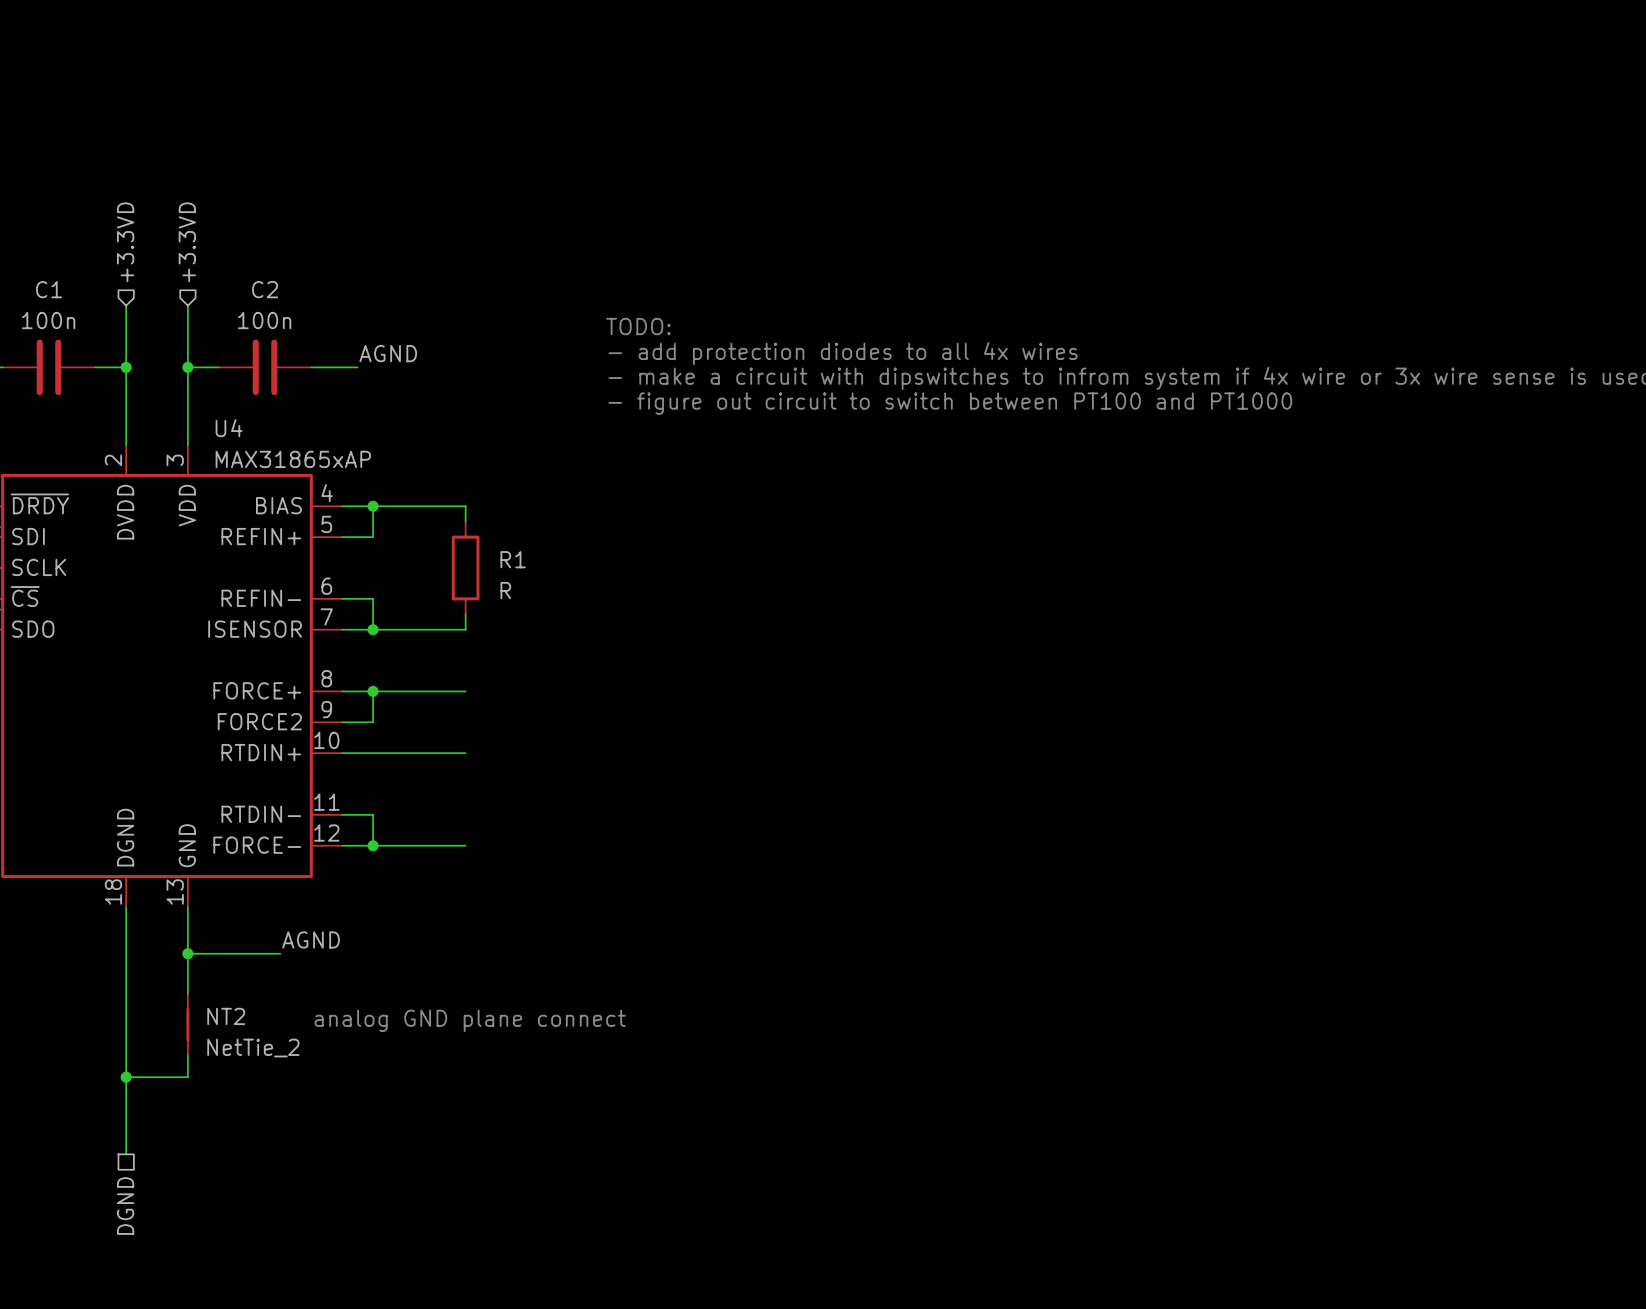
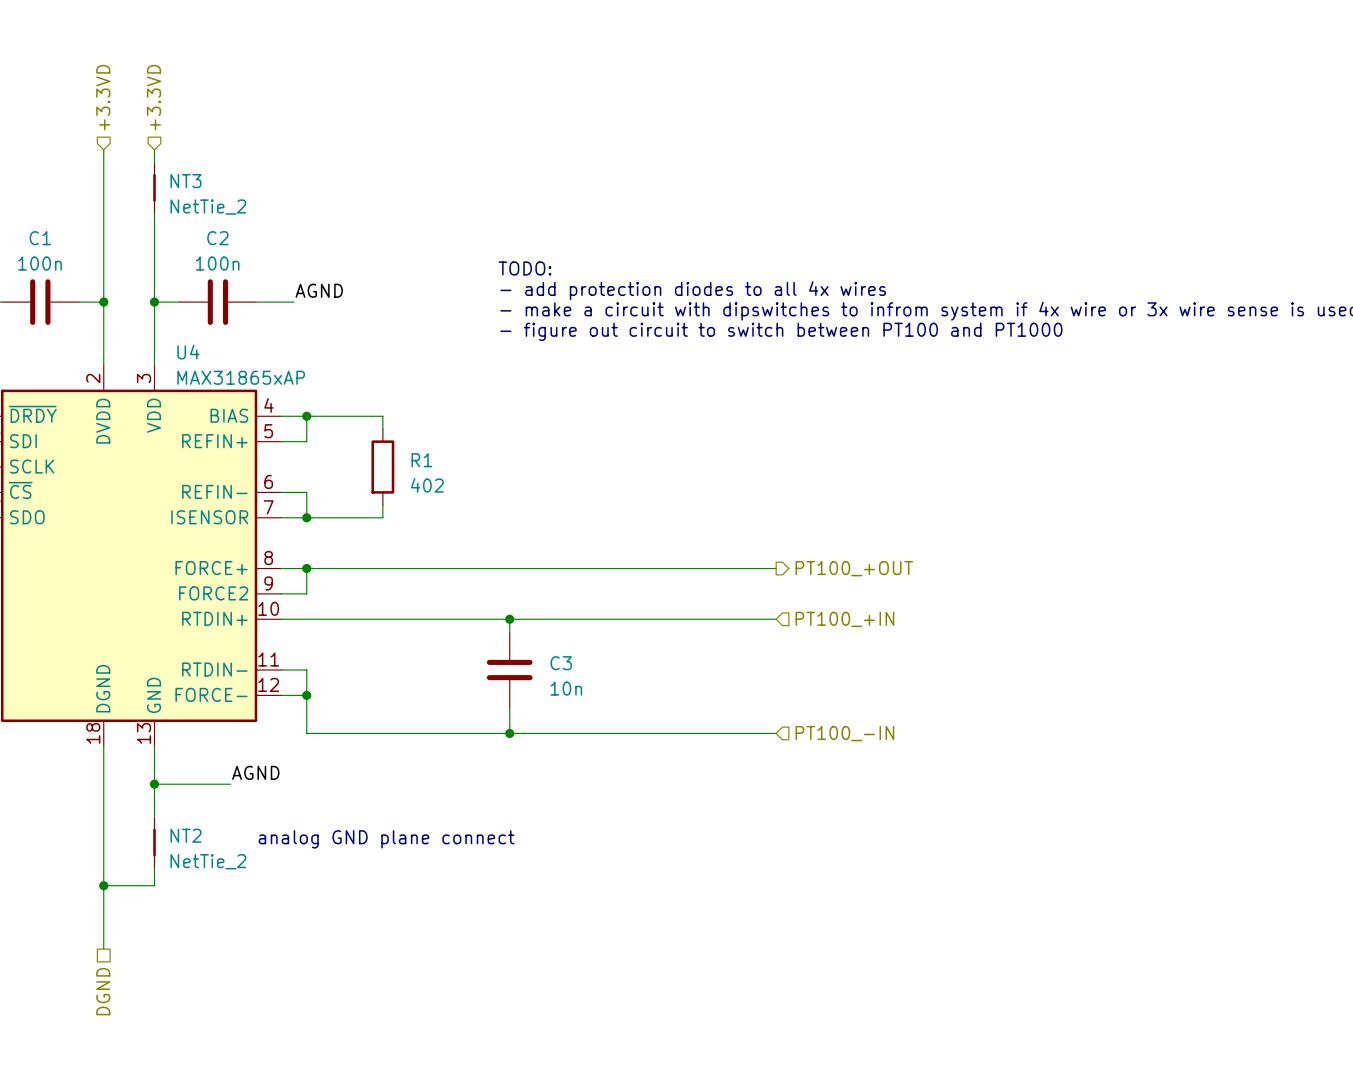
hierarchical label: none -> +3.3VD (103, 97)
hierarchical label: none -> +3.3VD (154, 97)
wire: none -> (103, 149) (103, 251)
wire: none -> (154, 149) (154, 162)
NT3: none -> NetTie_2 (154, 187)
hierarchical label: +3.3VD (125, 242) -> none
hierarchical label: +3.3VD (187, 242) -> none
wire: none -> (154, 213) (154, 251)
R1 value: R (505, 590) -> 402 (427, 485)
wire: none -> (382, 568) (776, 568)
hierarchical label: none -> PT100_+OUT (854, 568)
wire: none -> (382, 619) (776, 619)
wire: none -> (509, 619) (509, 631)
junction: none -> (509, 619)
hierarchical label: none -> PT100_+IN (844, 619)
C3: none -> 10n (509, 670)
wire: (373, 845) (465, 845) -> (306, 695) (306, 733) (776, 733)
wire: none -> (509, 708) (509, 733)
junction: none -> (509, 733)
hierarchical label: none -> PT100_-IN (844, 733)

